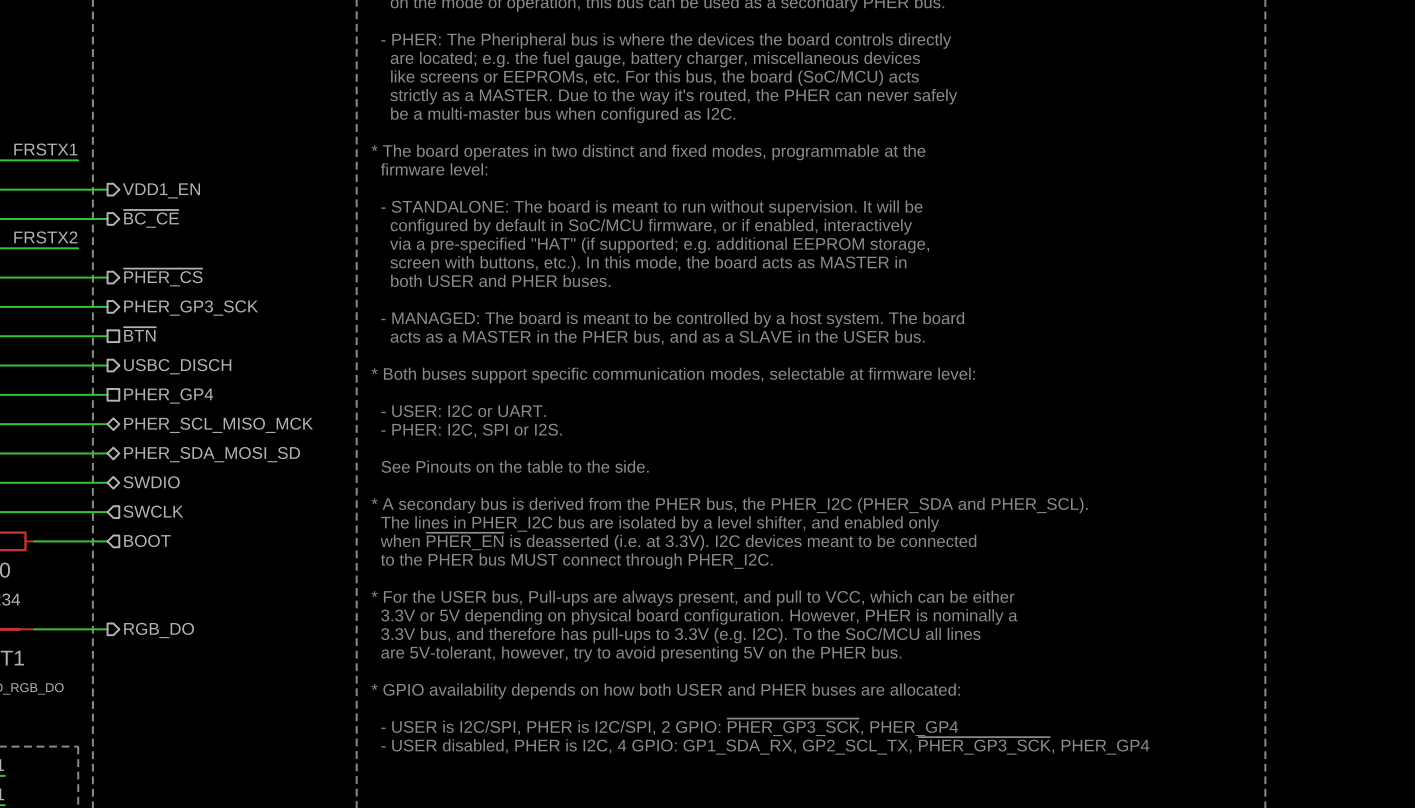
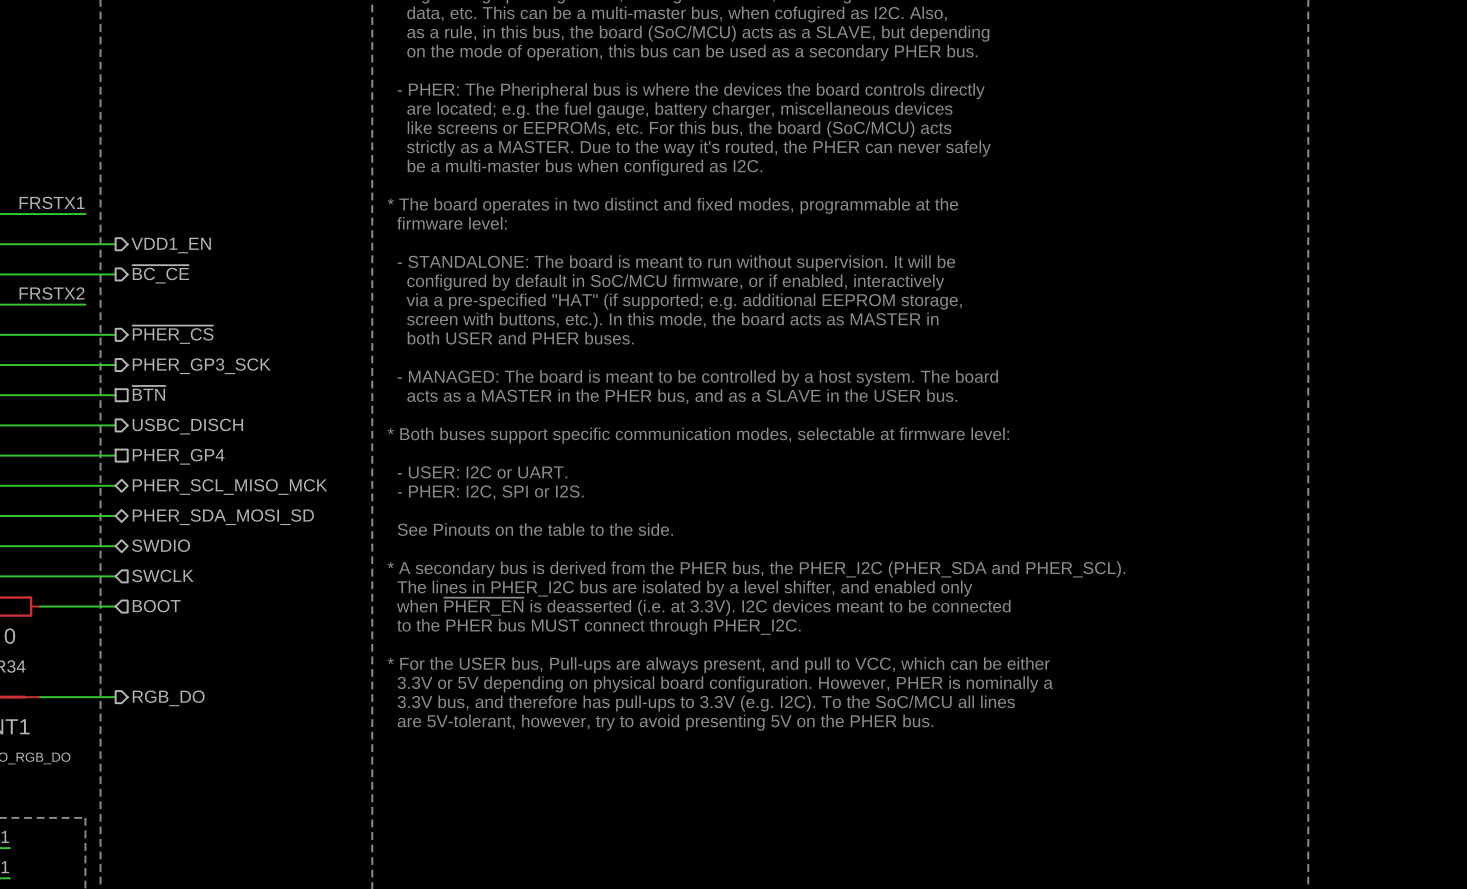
text: * GPIO availability depends on how both USER and PHER buses are allocated: (665, 691) -> none
text: - USER is I2C/SPI, PHER is I2C/SPI, 2 GPIO: ~{PHER_GP3_SCK}, PHER_GP4 (669, 727) -> none
text: - USER disabled, PHER is I2C, 4 GPIO: GP1_SDA_RX, GP2_SCL_TX, ~{PHER_GP3_SCK}, PHER_GP4 (765, 745) -> none

